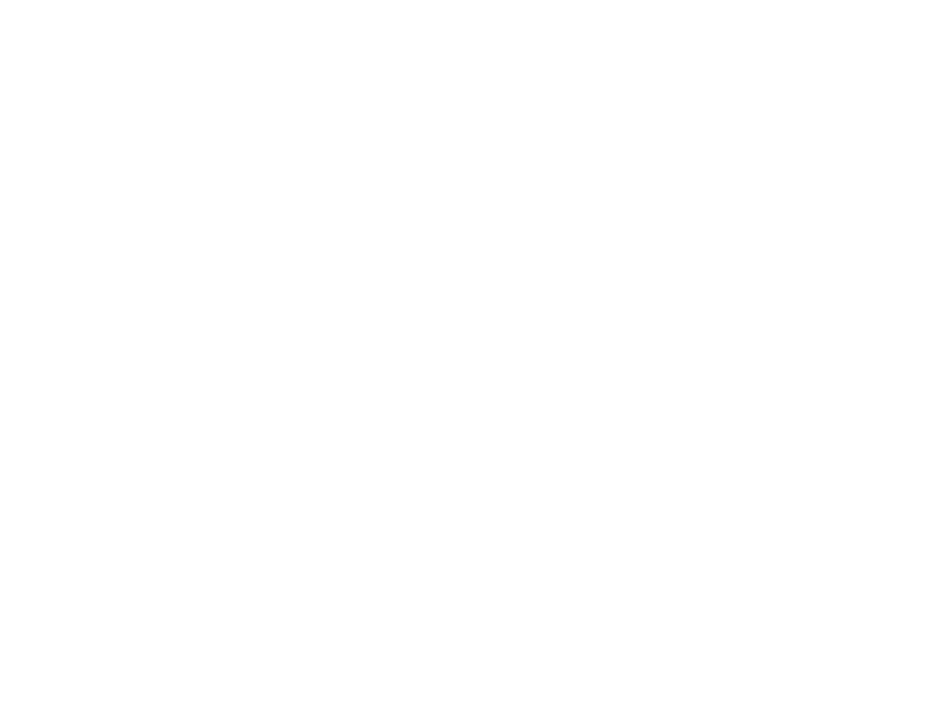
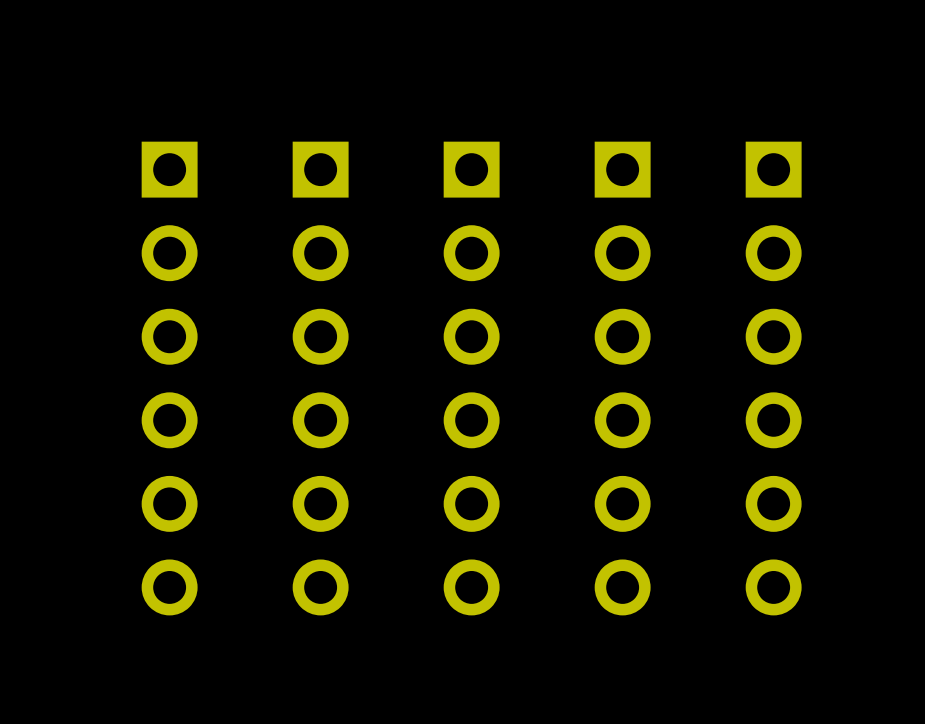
part: none -> (169, 378)
part: none -> (320, 378)
part: none -> (471, 378)
part: none -> (622, 378)
part: none -> (773, 378)

